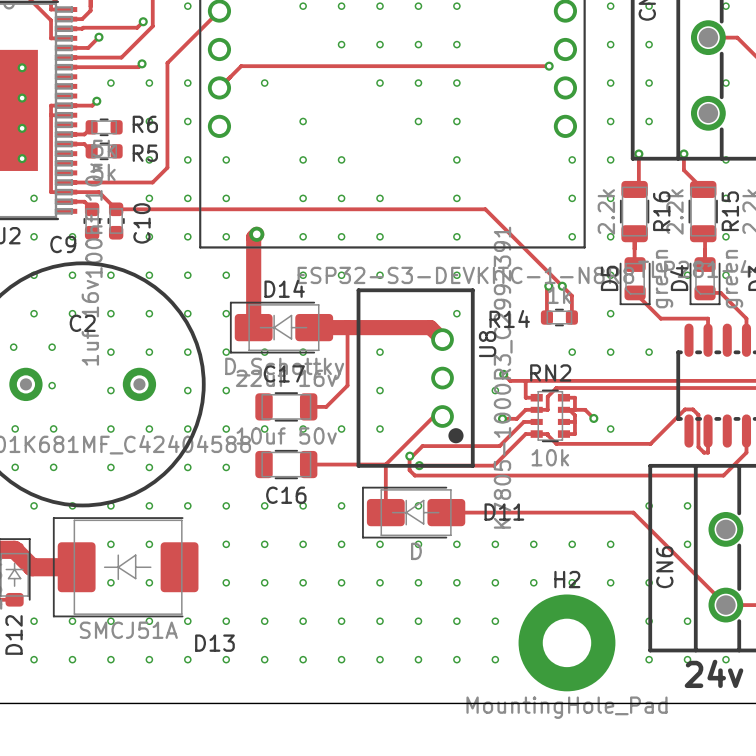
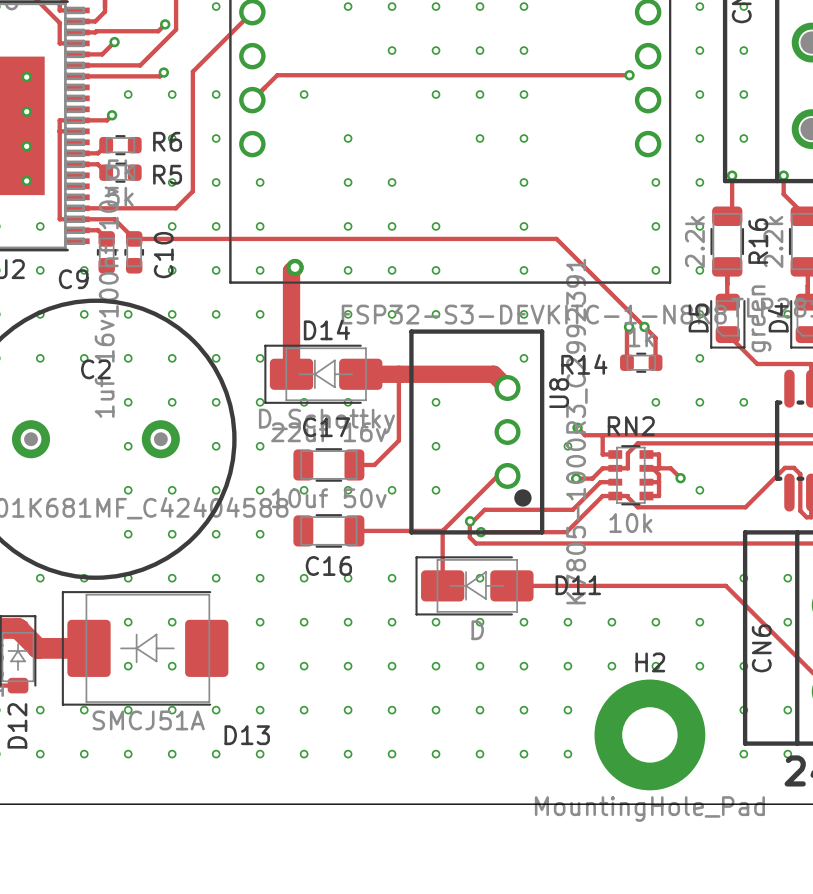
via: (13, 347) -> none
via: (52, 347) -> none
via: (52, 385) -> none
via: (15, 428) -> none
via: (53, 428) -> none
via: (15, 467) -> none
via: (53, 467) -> none

